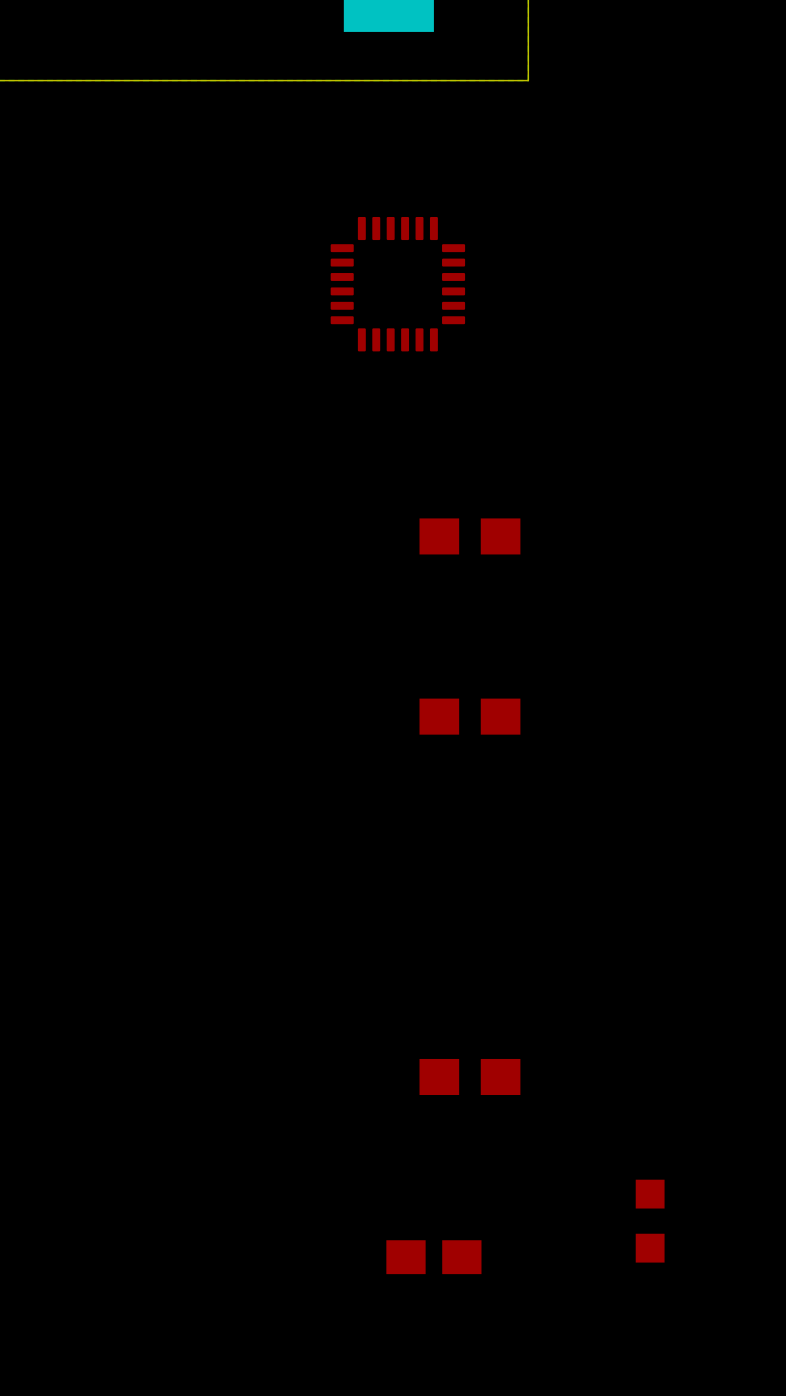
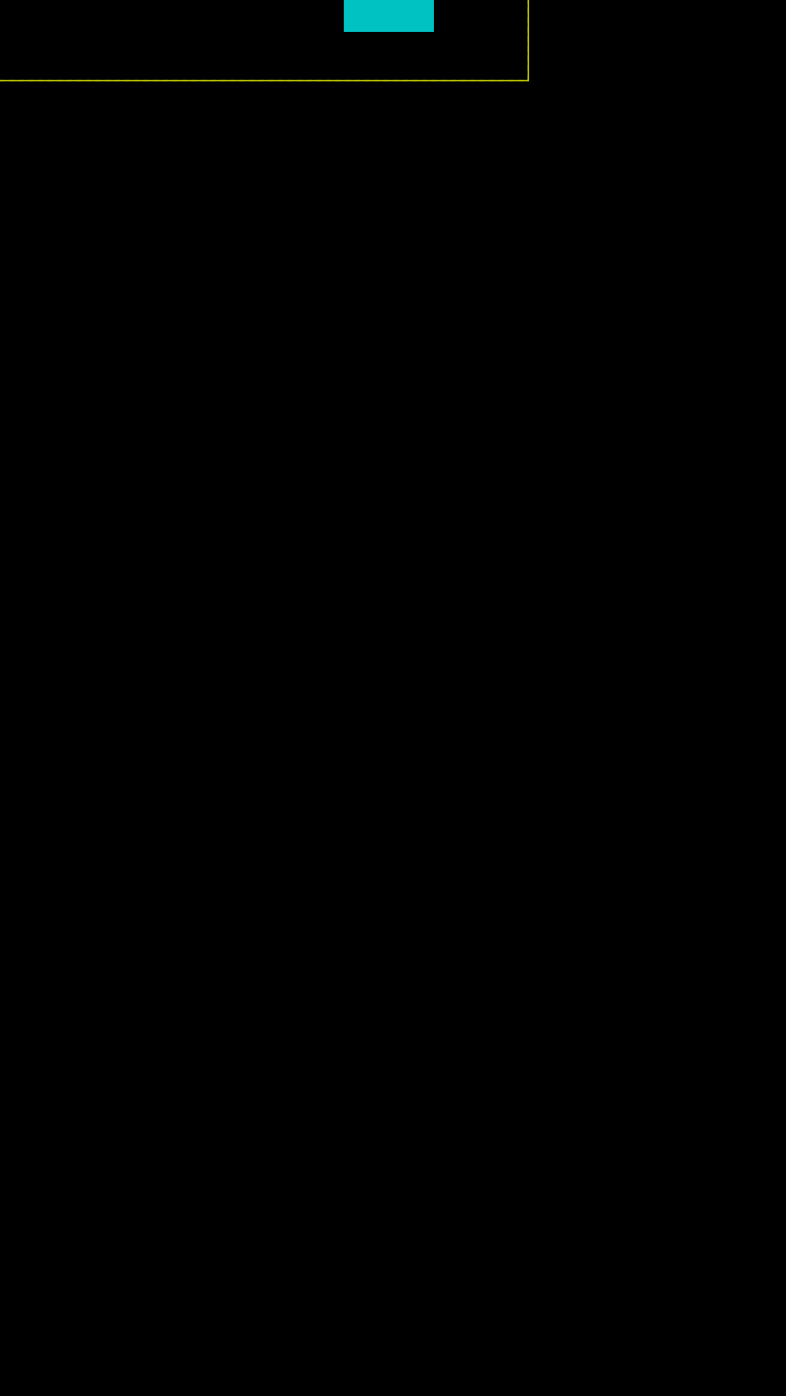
part: (397, 284) -> none
part: (469, 536) -> none
part: (469, 716) -> none
part: (469, 1076) -> none
part: (650, 1221) -> none
part: (433, 1257) -> none

